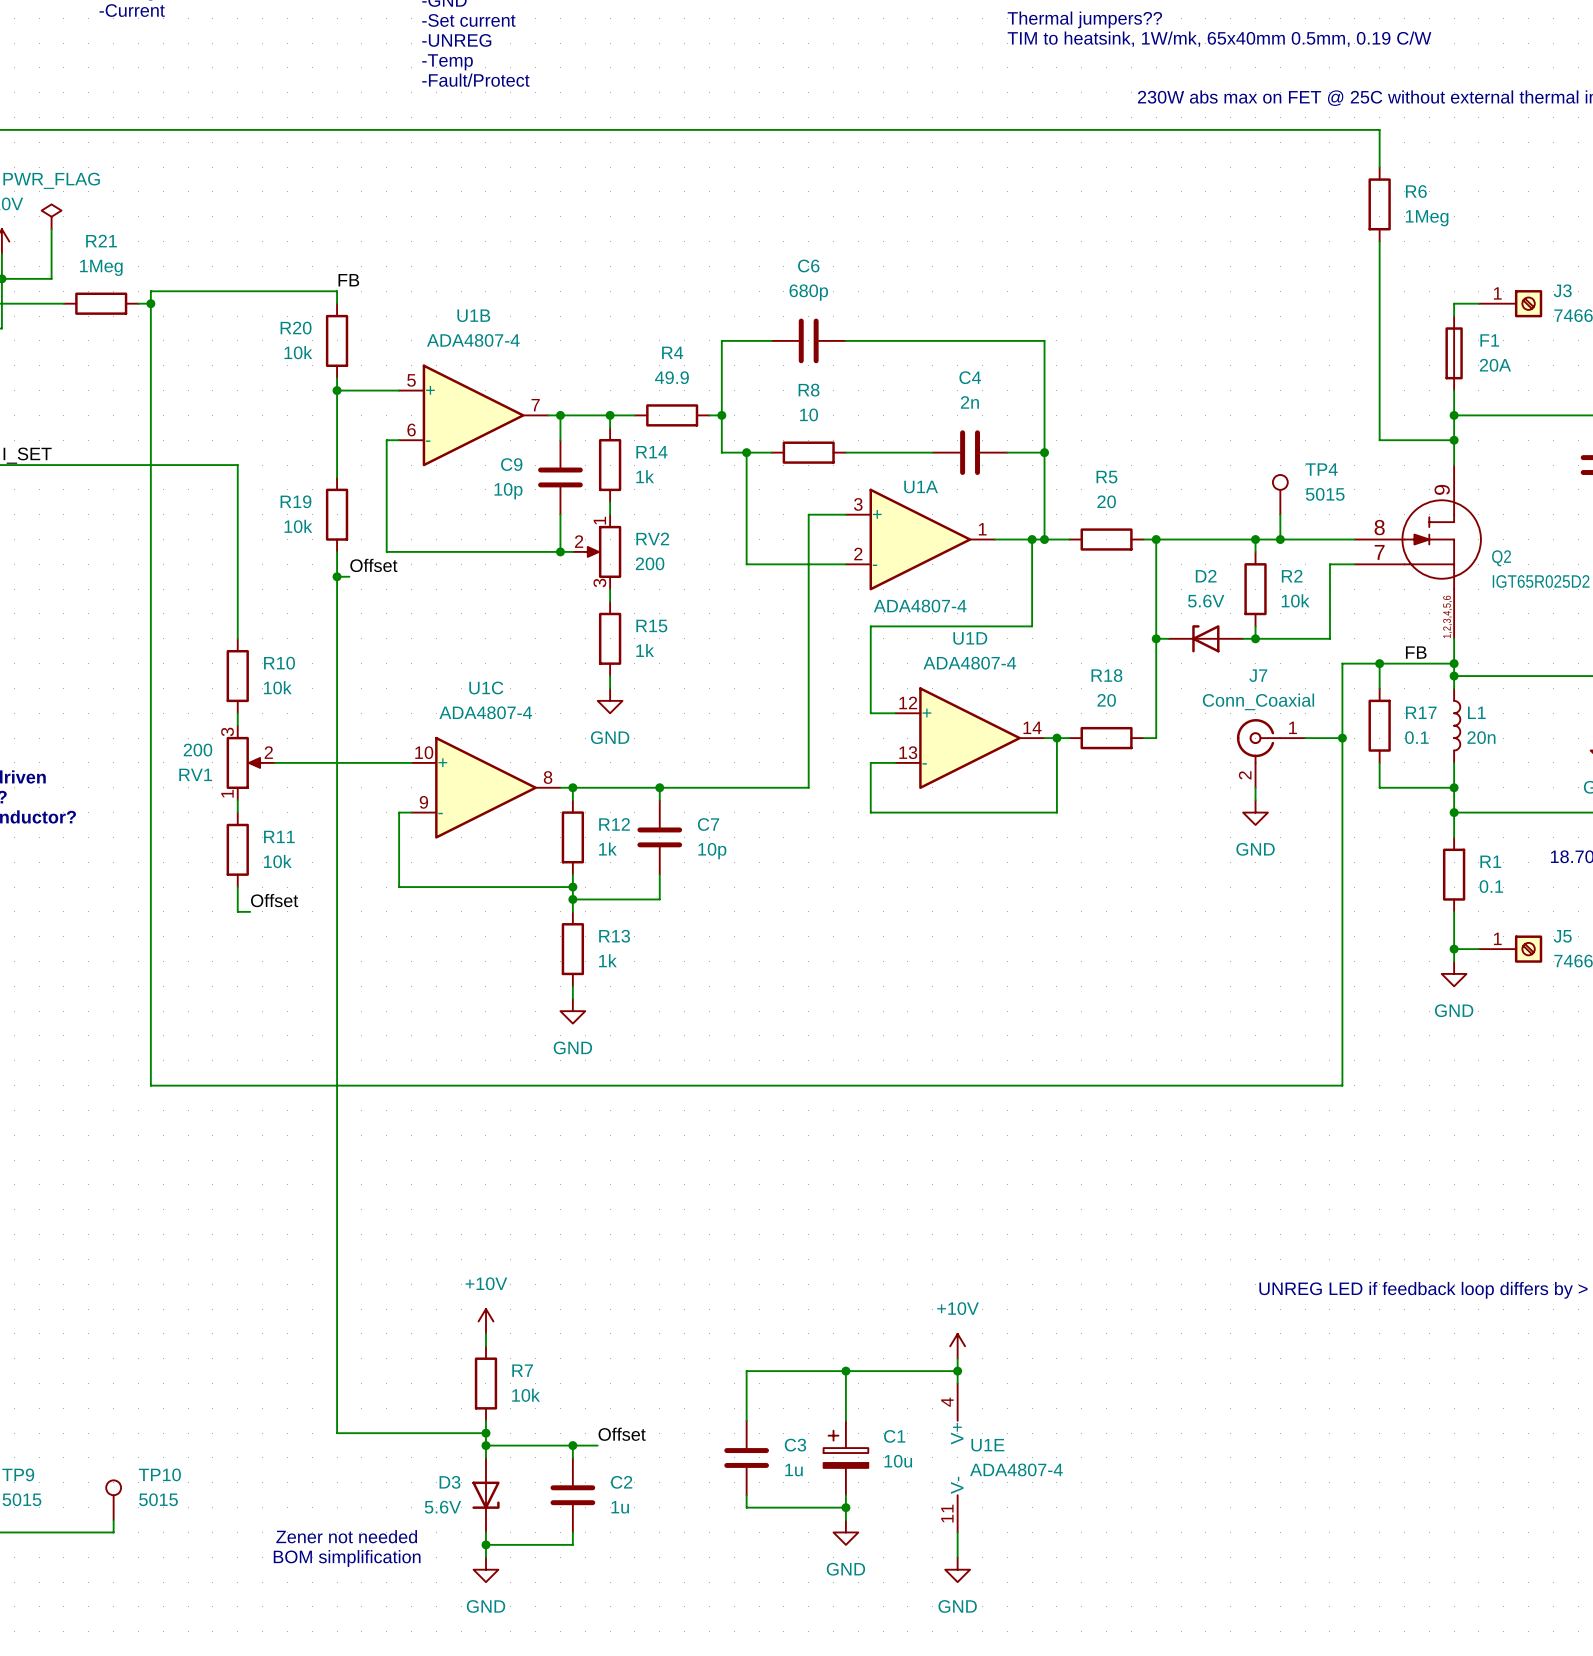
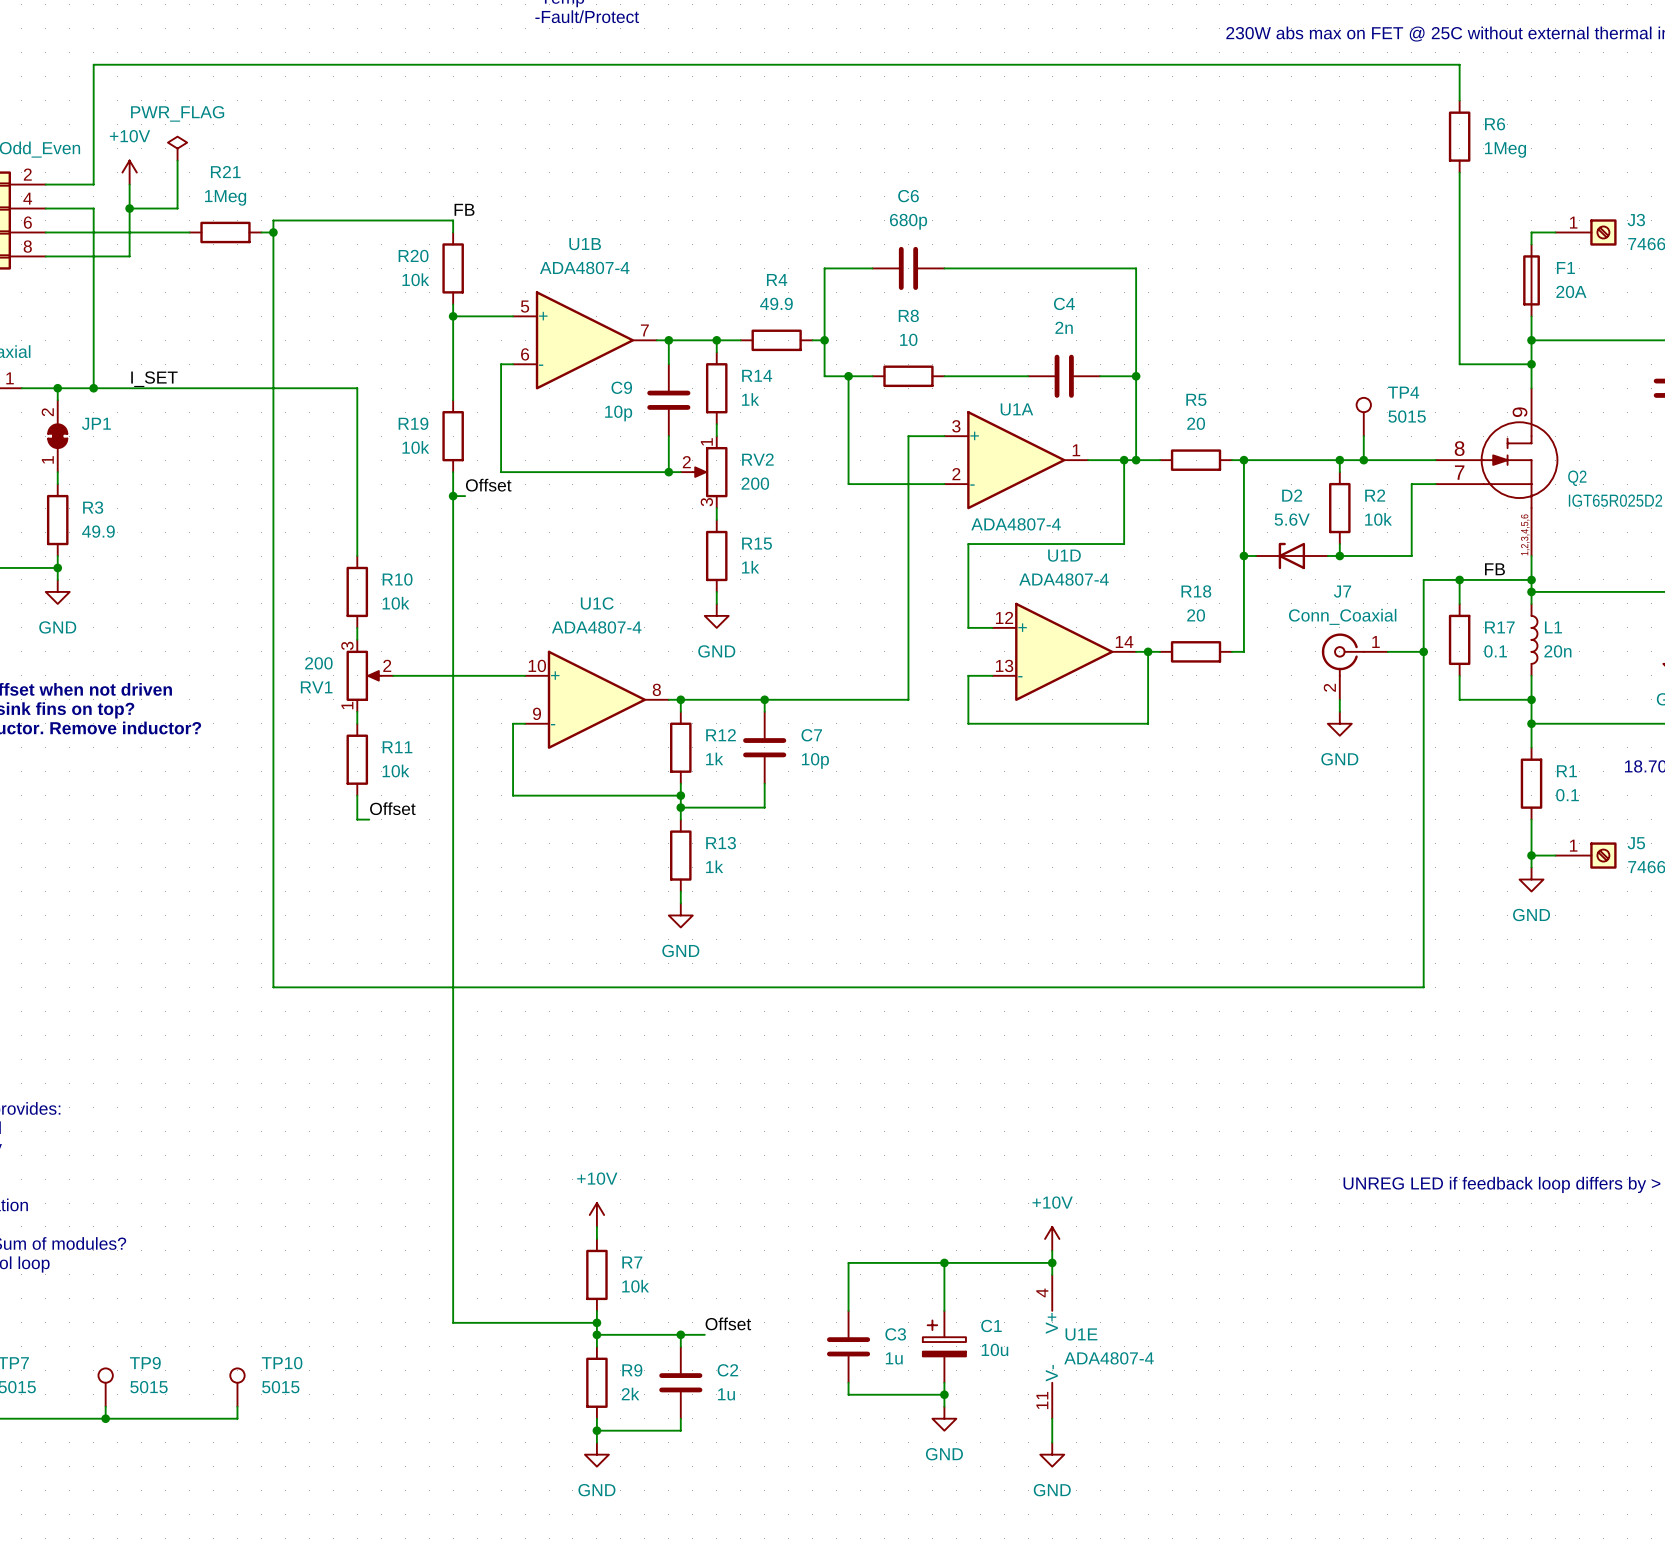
D3: 5.6V (485, 1495) -> none
R9: none -> 2k (596, 1382)
text: Zener not needed (346, 1536) -> none
text: BOM simplification (347, 1558) -> none

